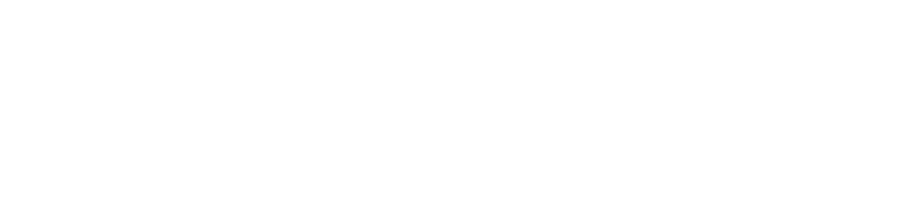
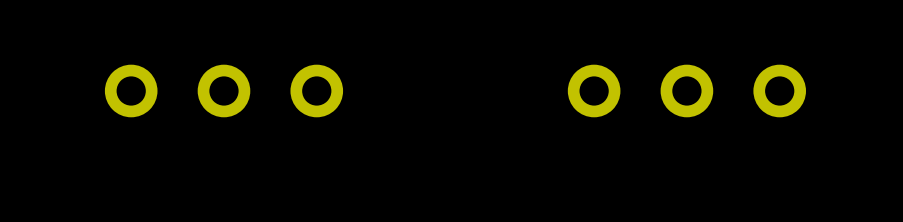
part: none -> (223, 90)
part: none -> (686, 90)

